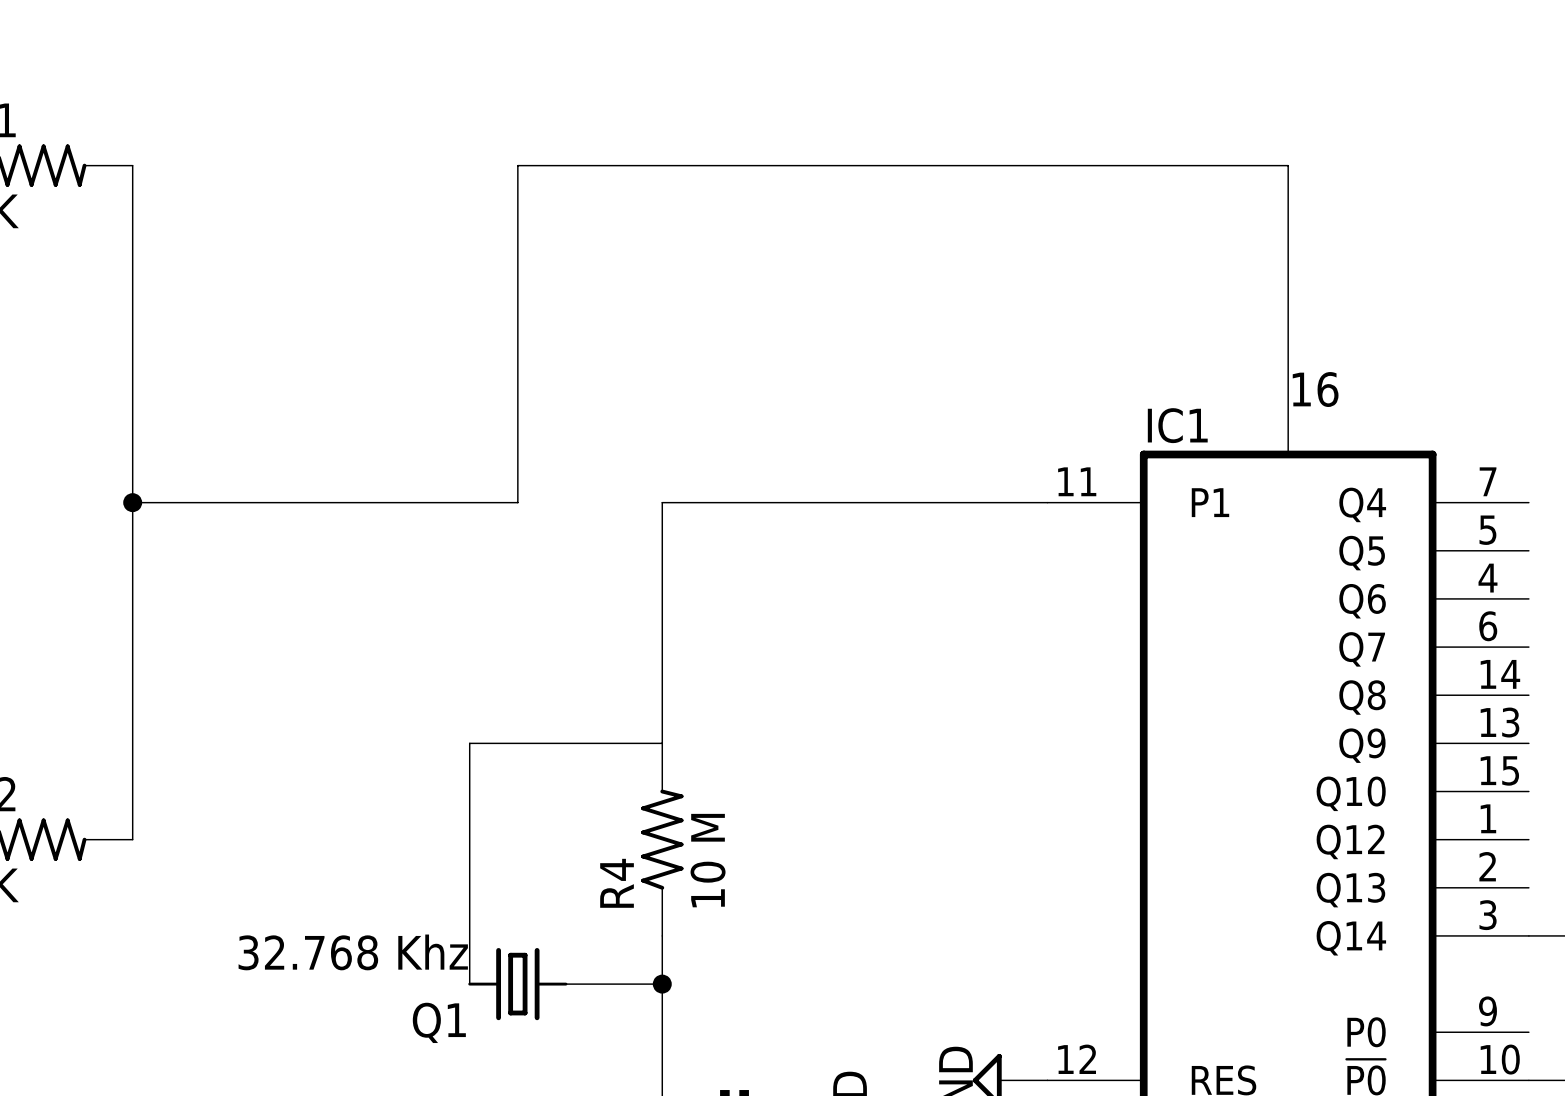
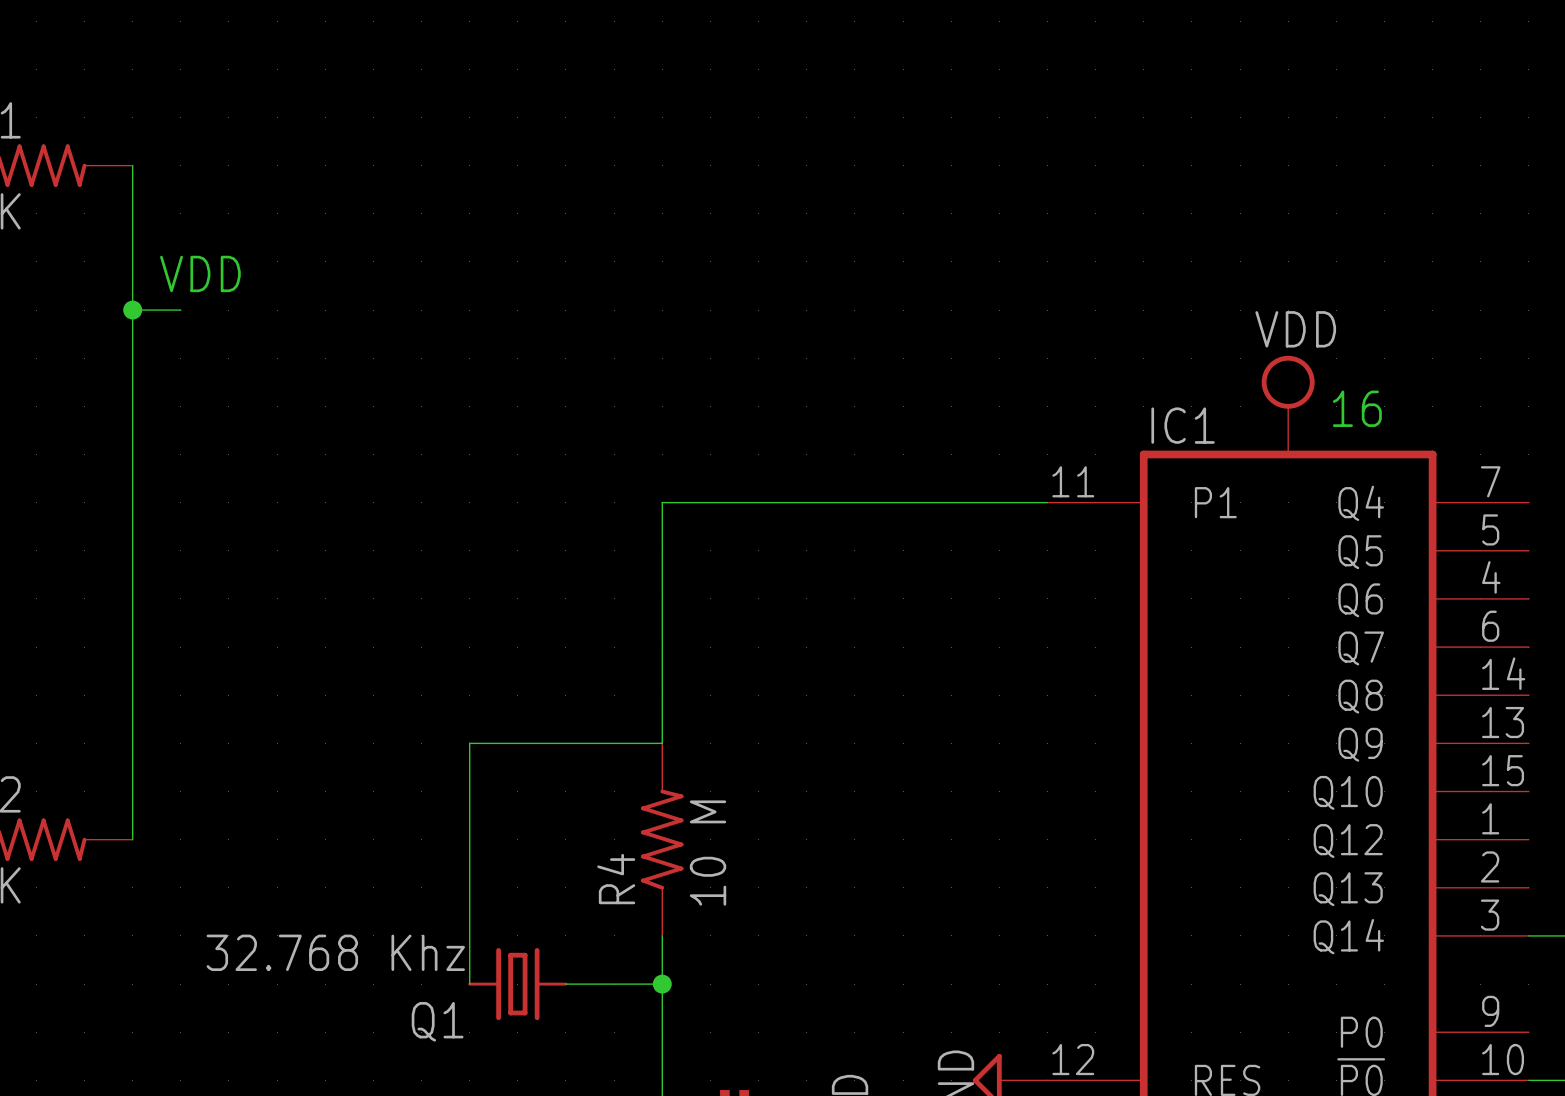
text: none -> VDD (200, 273)
wire: none -> (132, 310) (180, 310)
junction: none -> (132, 310)
text position: 16 (1315, 389) -> 16 (1357, 408)
power symbol: none -> VDD (1288, 405)
wire: (1288, 454) (1288, 165) (517, 165) (517, 502) (132, 502) -> none
junction: (132, 502) -> none

